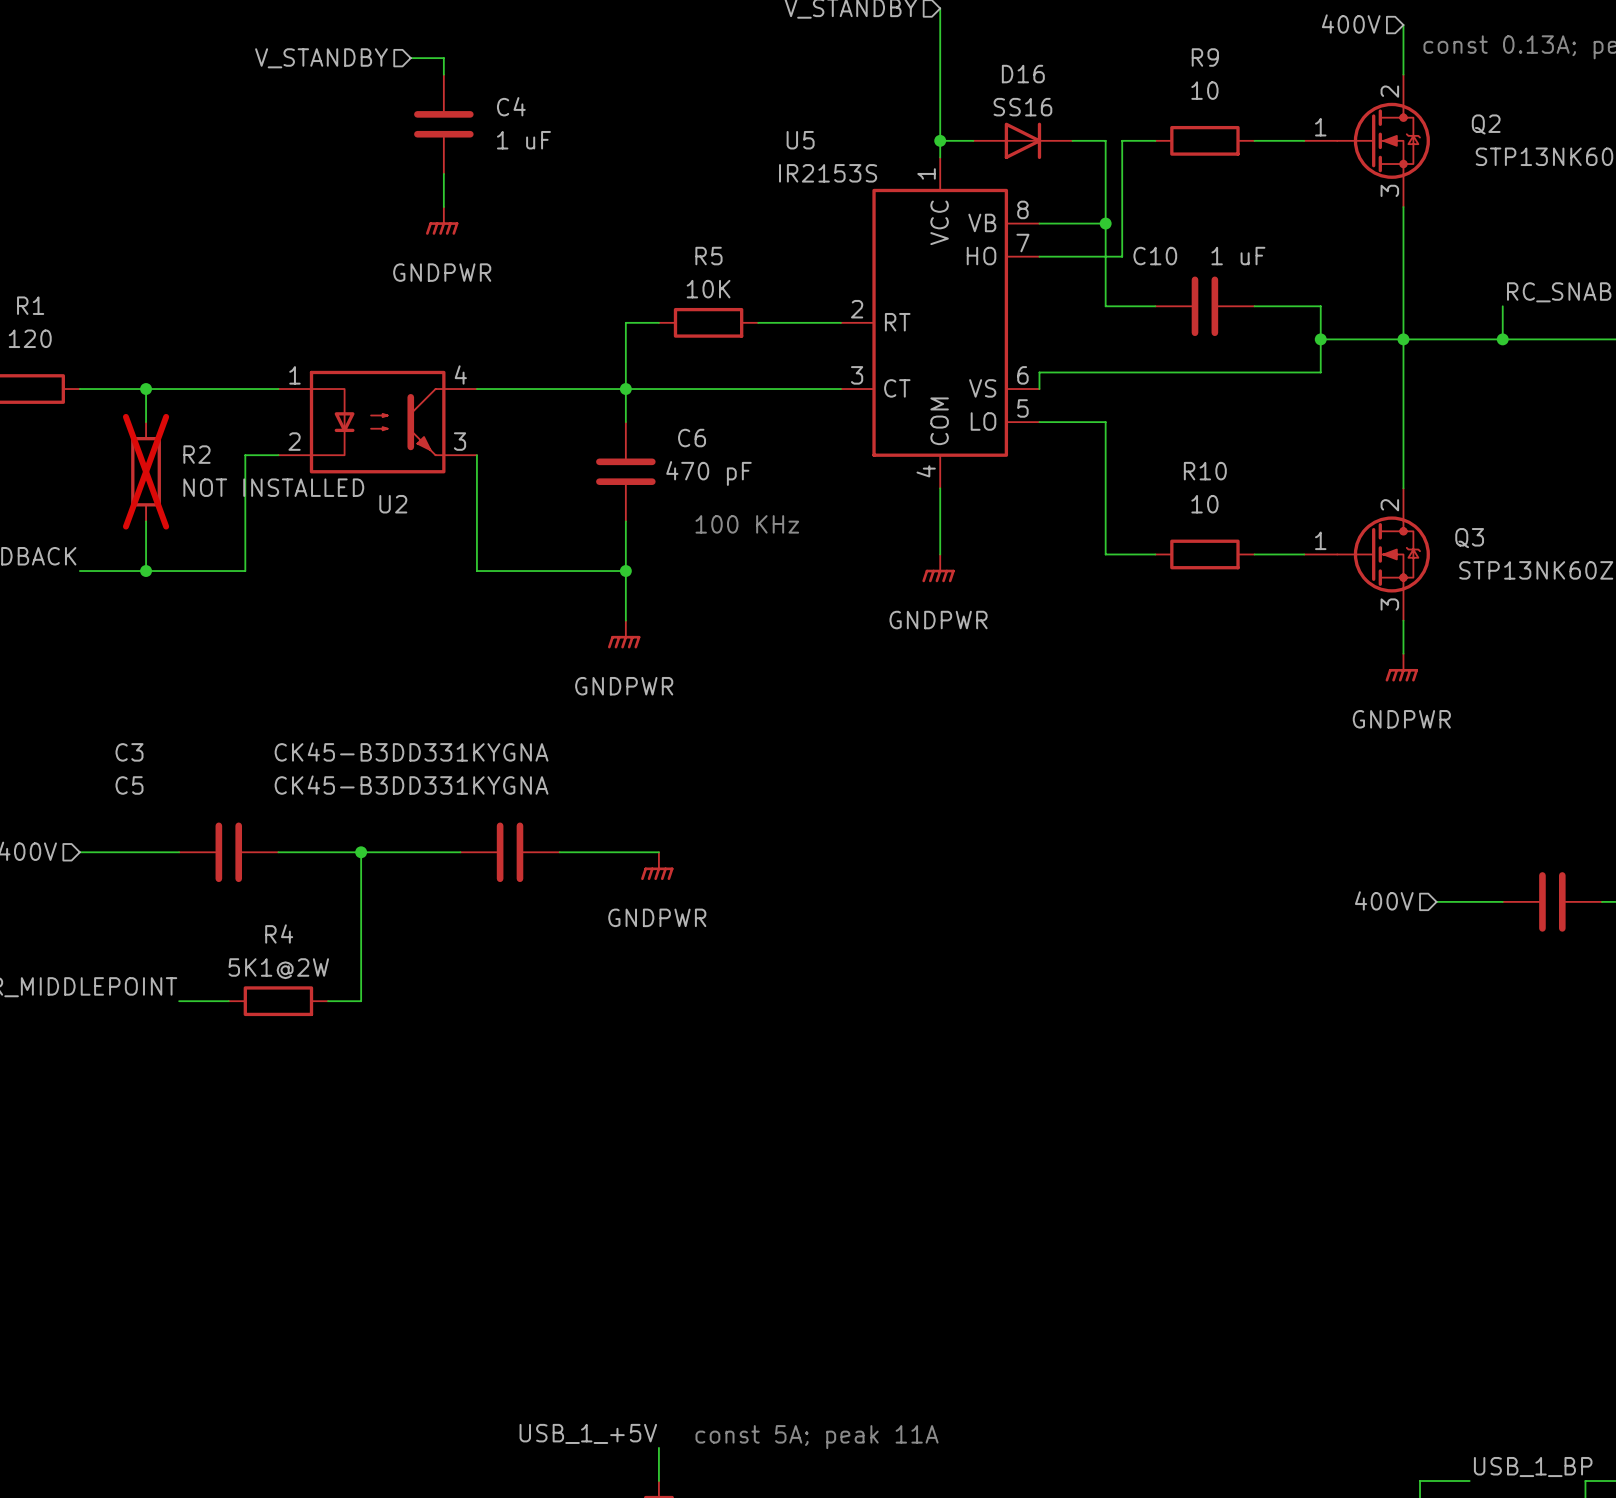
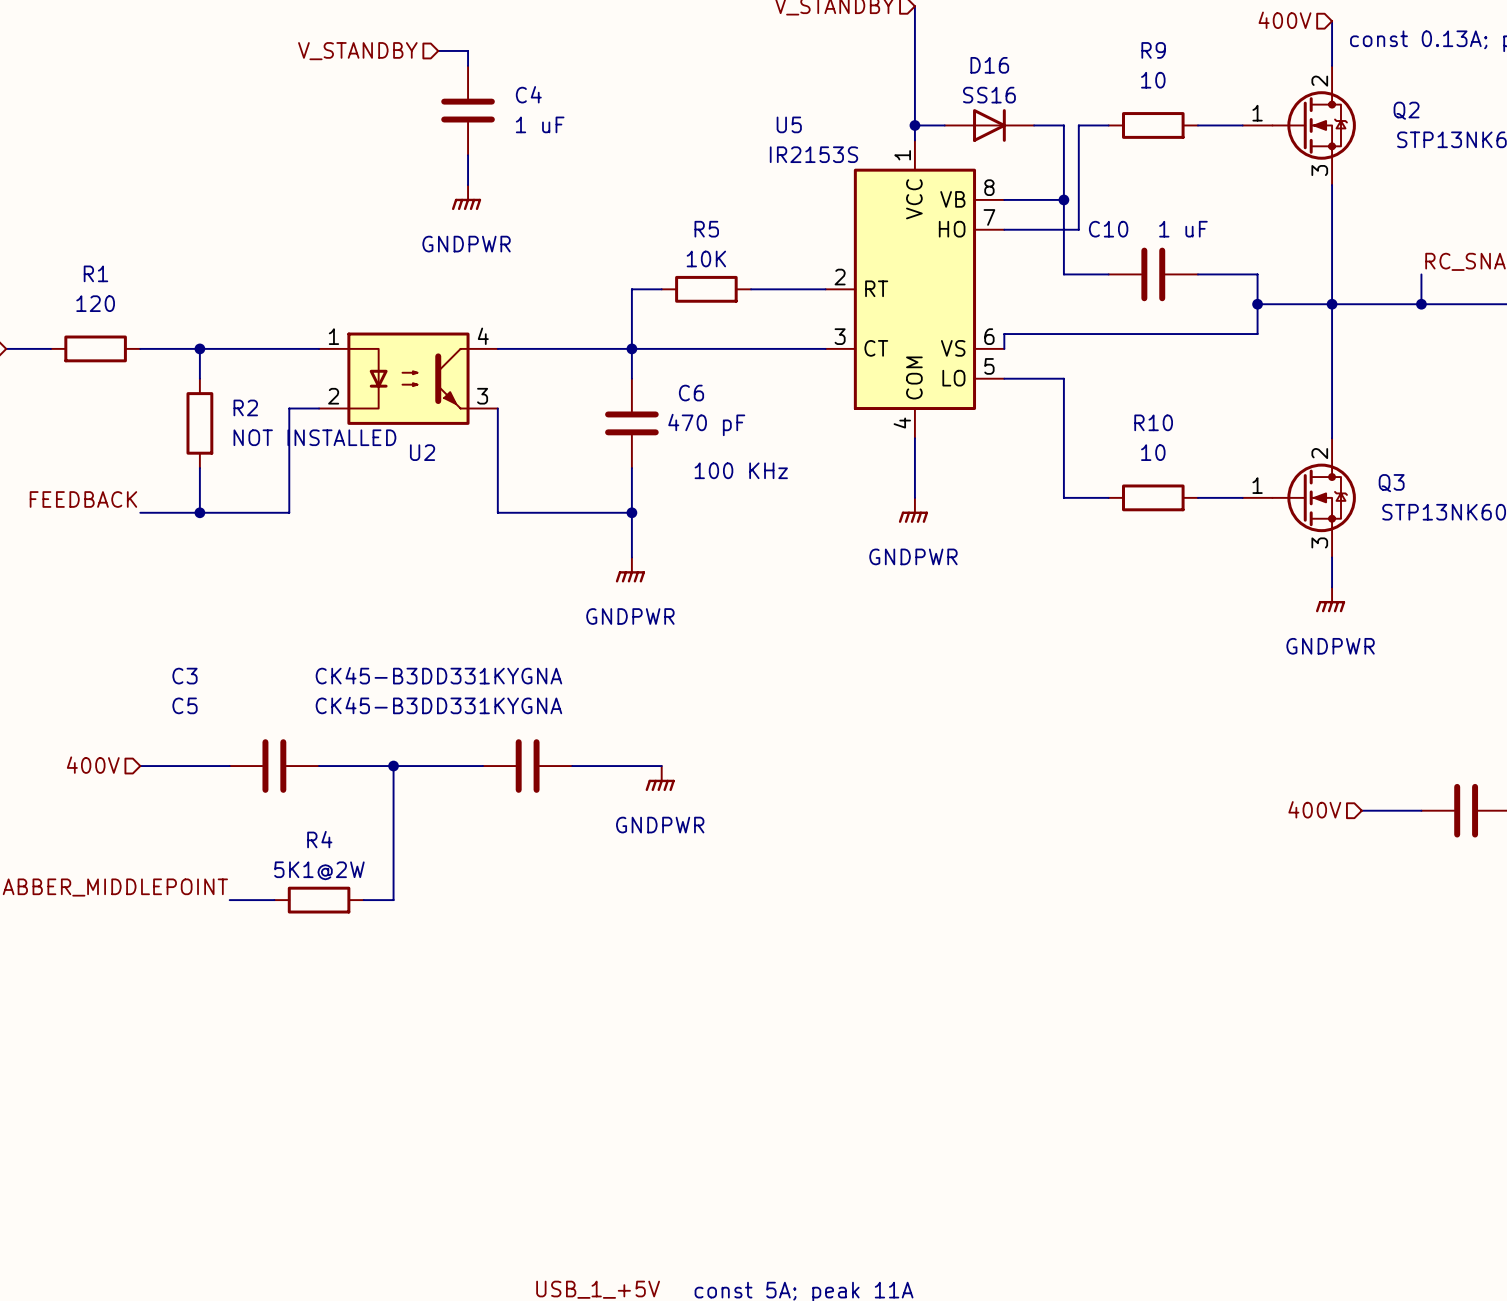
R2 do-not-place cross: (146, 471) -> none

